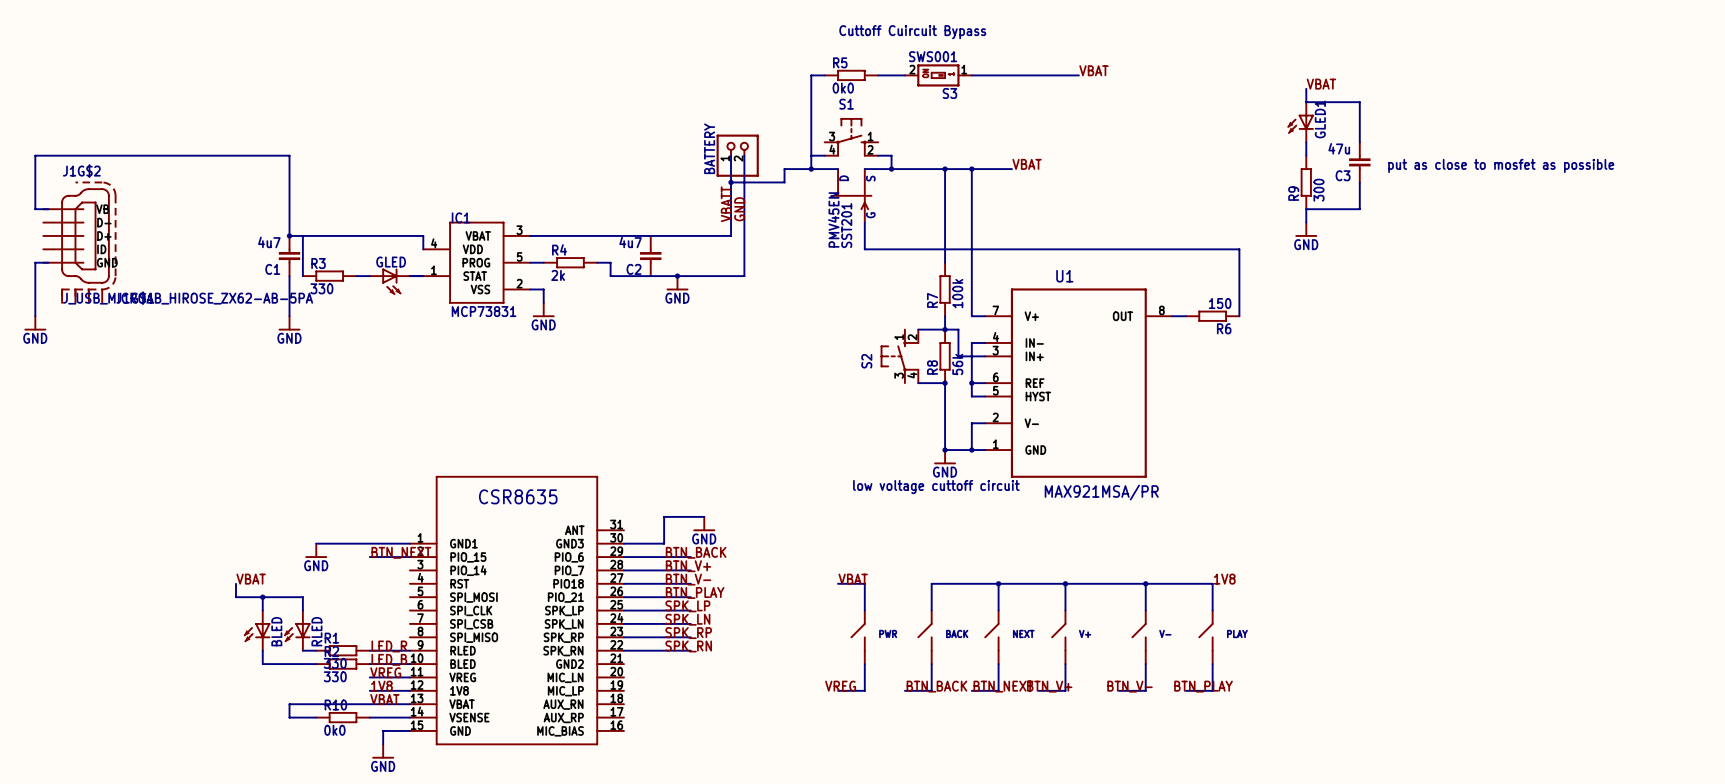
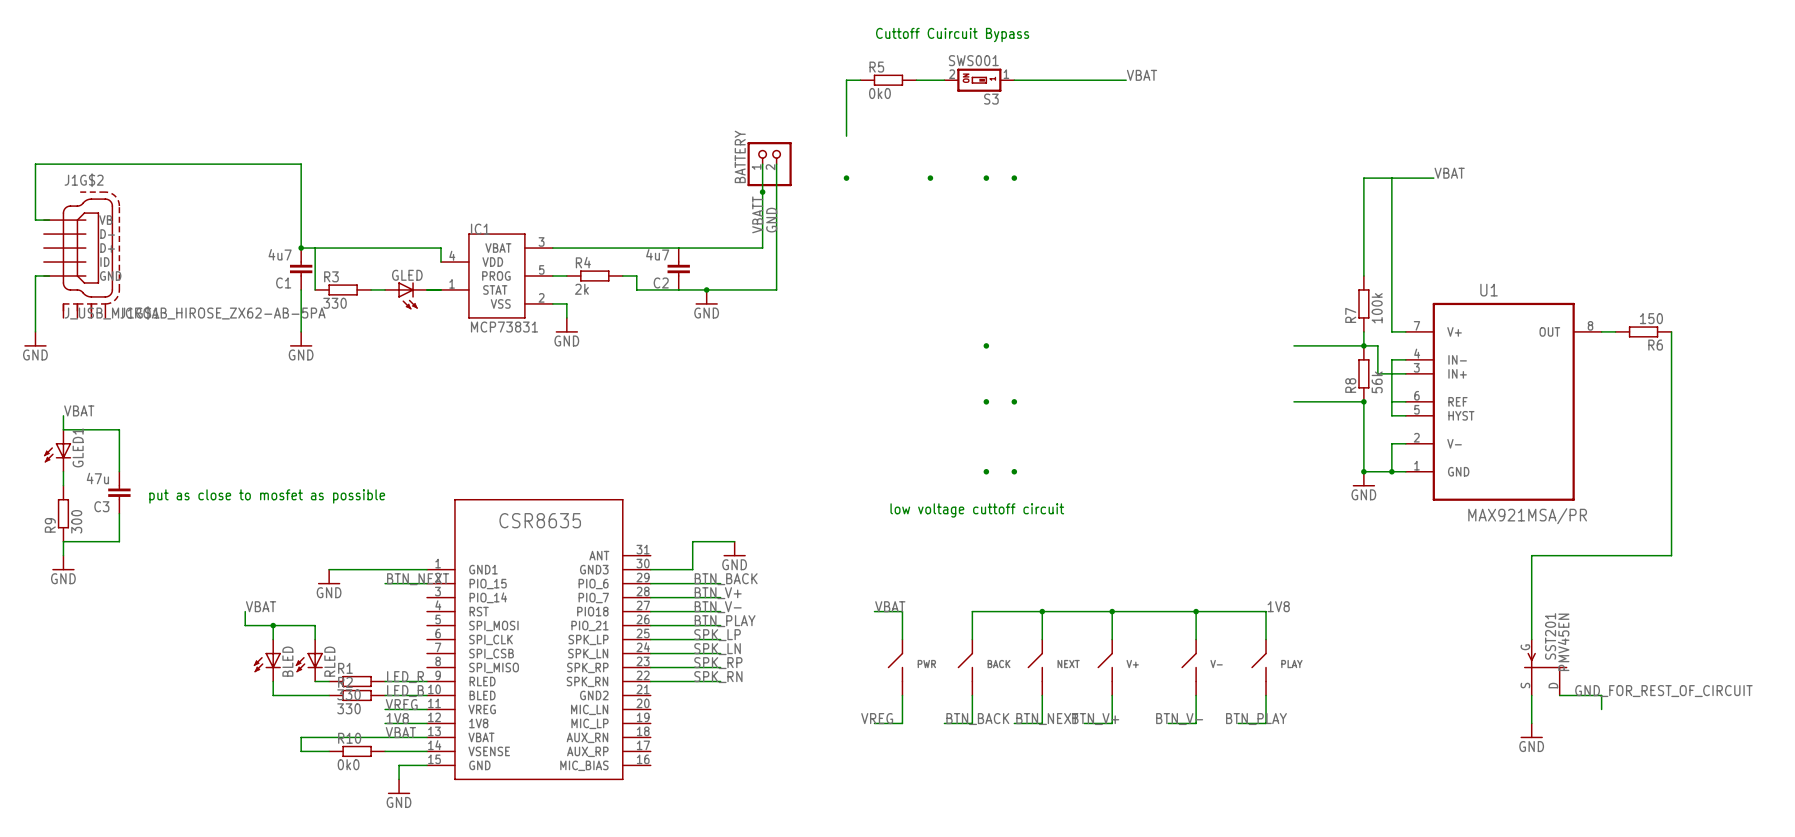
label position: VBAT (1321, 84) -> VBAT (1449, 173)
wire: (1306, 88) (1306, 102) (1359, 102) (1359, 142) -> none
GLED1 position: (1300, 122) -> (57, 450)
wire: (811, 128) (811, 169) -> none
S1: (851, 137) -> none
wire: (1306, 142) (1306, 155) -> none
wire: (811, 155) (824, 155) -> none
wire: (878, 155) (891, 155) (891, 169) -> none
C3 position: (1359, 162) -> (119, 492)
label: VBAT (1027, 164) -> none
text: put as close to mosfet as possible (1501, 165) -> none
PMV45EN symbol: [830, 169, 873, 223] -> [1524, 639, 1568, 696]
wire: (838, 169) (784, 169) (784, 182) (731, 182) -> none
wire: (864, 169) (1011, 169) -> none
wire: (945, 169) (945, 262) -> none
wire: (971, 169) (971, 316) (985, 316) -> none
wire: none -> (1391, 178) (1391, 331) (1405, 331)
R9 position: (1306, 182) -> (63, 513)
wire: (1359, 182) (1359, 209) (1306, 209) -> (1433, 178) (1363, 178) (1363, 220)
PMV45EN name position: PMV45EN (833, 219) -> PMV45EN (1563, 642)
wire: (864, 222) (864, 249) (1239, 249) (1239, 316) -> none
wire: none -> (1363, 234) (1363, 275)
PMV45EN value position: SST201 (846, 225) -> SST201 (1550, 636)
power symbol: GND (1306, 229) -> none
R7 position: (945, 289) -> (1363, 303)
wire: (945, 316) (945, 329) -> none
wire: (1172, 316) (1185, 316) -> none
R6 position: (1212, 316) -> (1643, 331)
wire: none -> (1363, 331) (1363, 345)
wire: none -> (1601, 331) (1615, 331)
wire: none -> (1671, 331) (1671, 555) (1531, 555) (1531, 639)
wire: (918, 329) (958, 329) (958, 356) (985, 356) -> none
wire: none -> (1293, 345) (1377, 345) (1377, 373) (1405, 373)
junction: none -> (1363, 345)
wire: (985, 342) (971, 342) (971, 396) (985, 396) -> none
wire: none -> (1405, 359) (1391, 359) (1391, 415) (1405, 415)
S2: (899, 356) -> none
R8 position: (945, 356) -> (1363, 373)
wire: (918, 383) (945, 383) (945, 450) (985, 450) -> none
wire: (971, 383) (985, 383) -> none
U1 position: (1078, 383) -> (1503, 401)
wire: none -> (1293, 401) (1363, 401) (1363, 471) (1405, 471)
junction: none -> (1363, 401)
wire: none -> (1391, 401) (1405, 401)
label: none -> VBAT (79, 410)
wire: none -> (63, 415) (63, 429) (119, 429) (119, 471)
wire: (985, 423) (971, 423) (971, 450) -> none
wire: none -> (1405, 443) (1391, 443) (1391, 471)
wire: none -> (63, 471) (63, 485)
junction: none -> (1363, 471)
junction: none -> (1391, 471)
power symbol: GND (945, 457) -> none
power symbol: none -> GND (1363, 479)
text: none -> put as close to mosfet as possible (267, 496)
wire: none -> (119, 513) (119, 541) (63, 541) (63, 555)
power symbol: none -> GND (63, 563)
label: none -> GND_FOR_REST_OF_CIRCUIT (1663, 691)
wire: none -> (1531, 695) (1531, 723)
wire: none -> (1559, 695) (1601, 695) (1601, 709)
power symbol: none -> GND (1531, 730)

